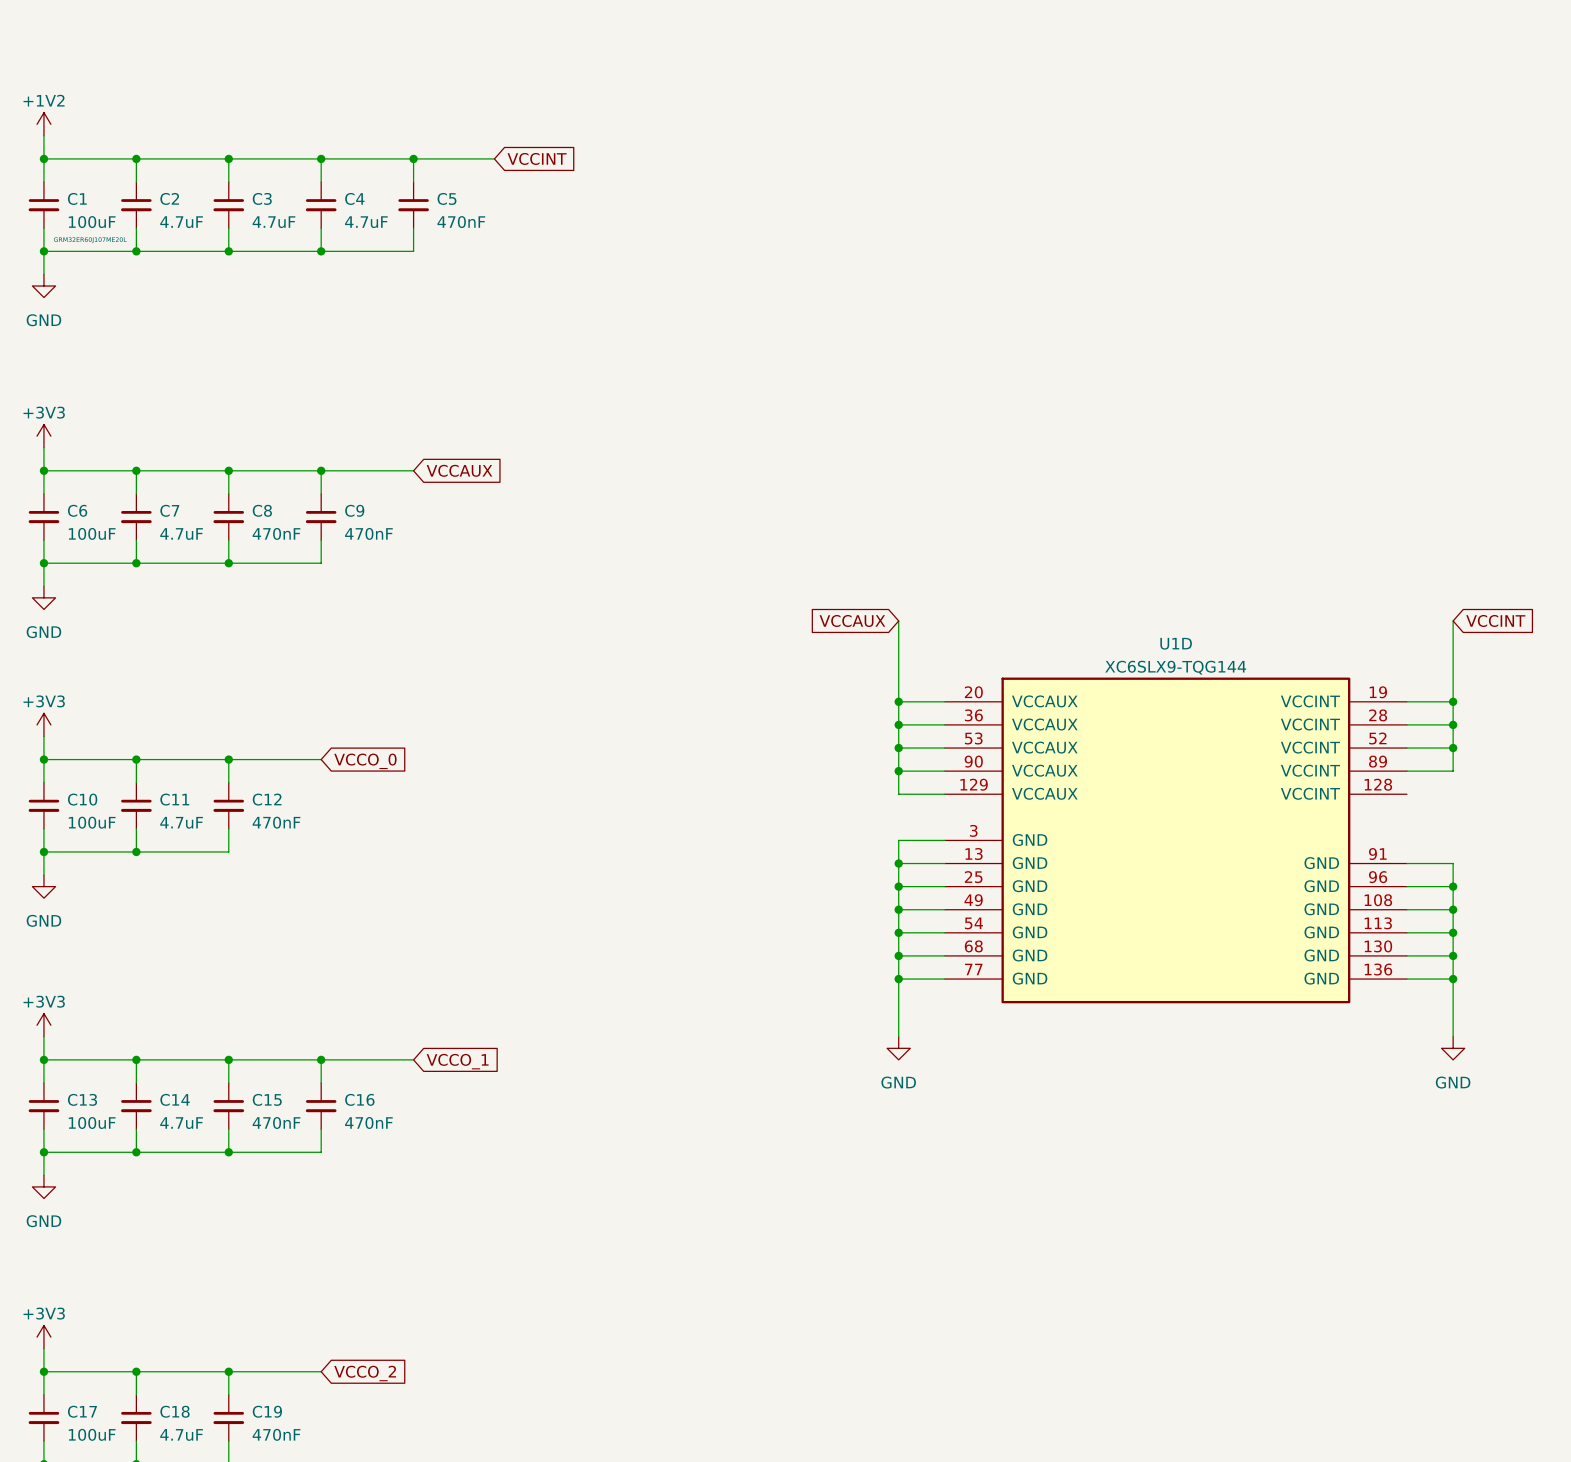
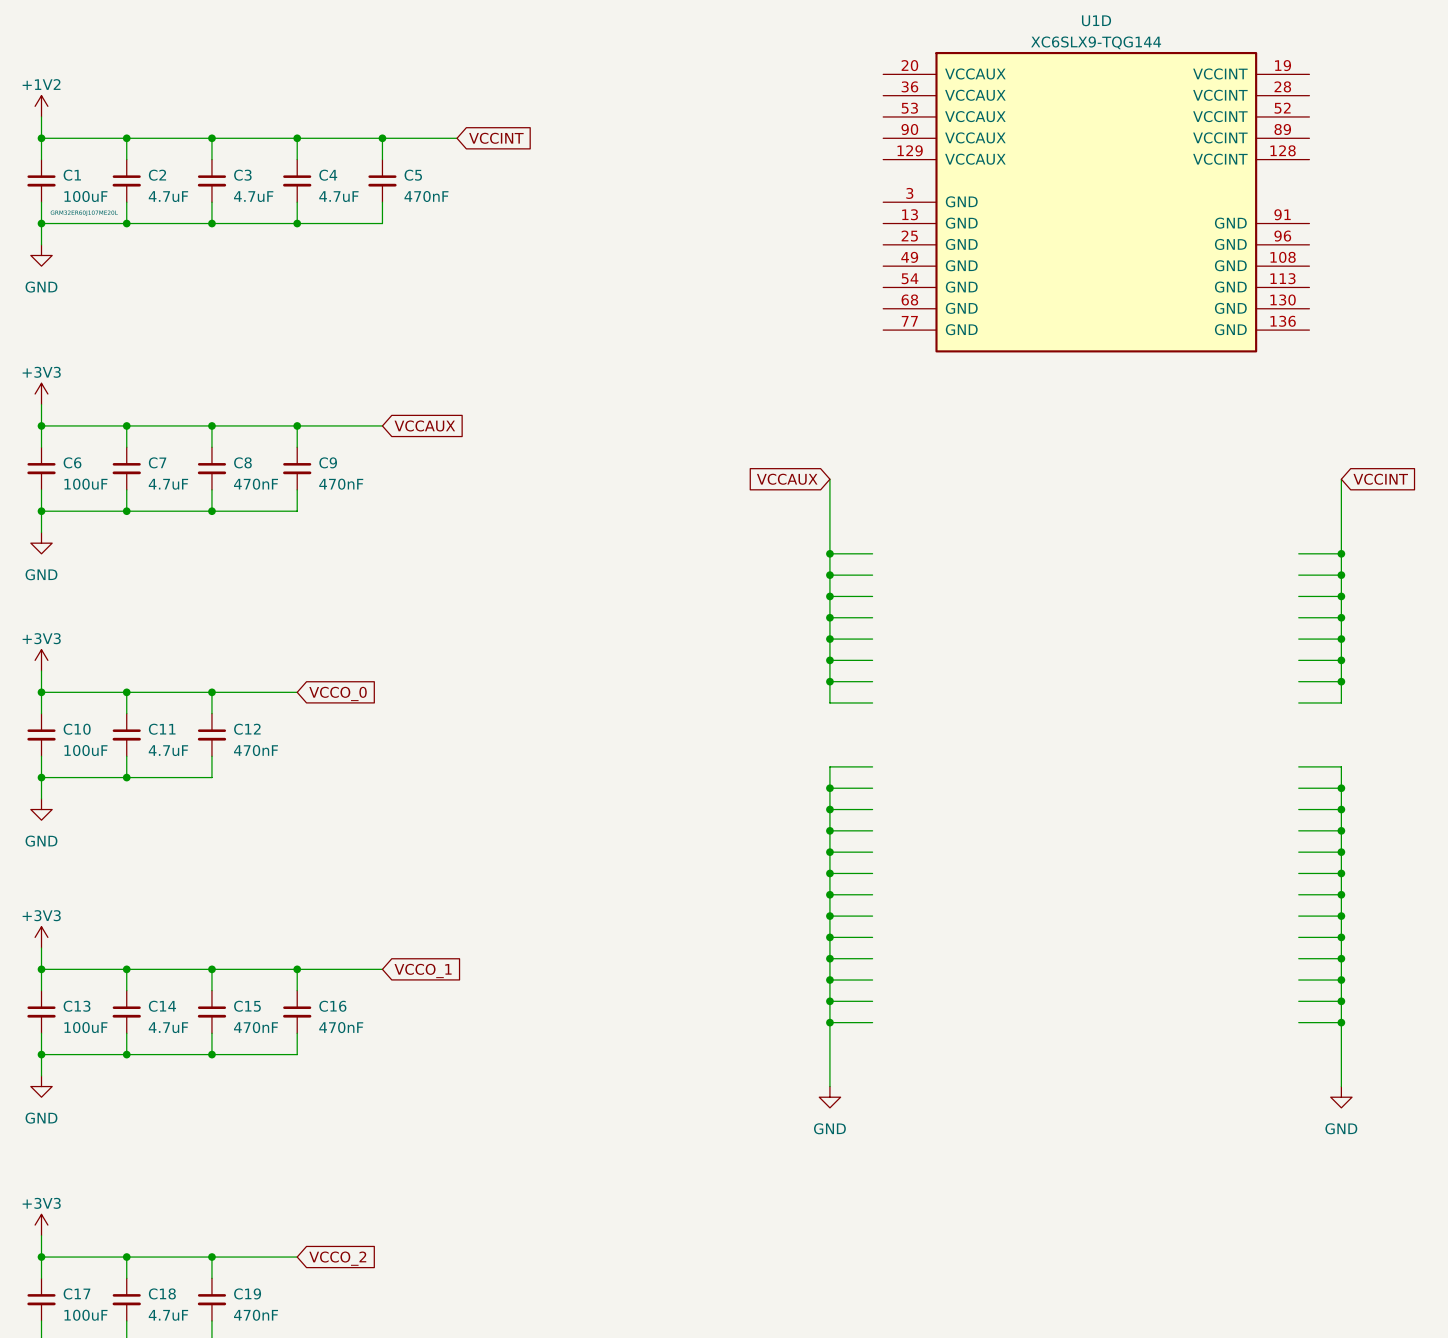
wire: none -> (829, 479) (829, 564)
wire: none -> (1341, 479) (1341, 564)
wire: none -> (829, 553) (872, 553)
junction: none -> (829, 553)
wire: none -> (1298, 553) (1341, 553)
junction: none -> (1341, 553)
global label position: VCCAUX (852, 620) -> VCCAUX (787, 479)
global label position: VCCINT (1495, 620) -> VCCINT (1380, 479)
wire: none -> (829, 575) (872, 575)
junction: none -> (829, 575)
wire: none -> (1298, 575) (1341, 575)
junction: none -> (1341, 575)
wire: none -> (829, 596) (872, 596)
junction: none -> (829, 596)
wire: none -> (1298, 596) (1341, 596)
junction: none -> (1341, 596)
wire: none -> (829, 617) (872, 617)
junction: none -> (829, 617)
wire: none -> (1298, 617) (1341, 617)
junction: none -> (1341, 617)
wire: (898, 771) (898, 794) (944, 794) -> none
junction: (898, 771) -> none
U1D position: (1175, 840) -> (1096, 202)
wire: none -> (1298, 766) (1341, 766) (1341, 788)
junction: none -> (1341, 788)
wire: none -> (829, 916) (872, 916)
junction: none -> (829, 916)
wire: none -> (1298, 916) (1341, 916)
junction: none -> (1341, 916)
wire: none -> (829, 937) (872, 937)
junction: none -> (829, 937)
wire: none -> (1298, 937) (1341, 937)
junction: none -> (1341, 937)
wire: none -> (829, 948) (829, 1086)
wire: none -> (1341, 948) (1341, 1086)
wire: none -> (829, 958) (872, 958)
junction: none -> (829, 958)
power symbol position: GND (898, 1048) -> GND (829, 1097)
wire: none -> (1298, 958) (1341, 958)
junction: none -> (1341, 958)
power symbol position: GND (1453, 1048) -> GND (1341, 1097)
wire: none -> (829, 980) (872, 980)
junction: none -> (829, 980)
wire: none -> (1298, 980) (1341, 980)
junction: none -> (1341, 980)
wire: none -> (829, 1001) (872, 1001)
junction: none -> (829, 1001)
wire: none -> (1298, 1001) (1341, 1001)
junction: none -> (1341, 1001)
wire: none -> (829, 1022) (872, 1022)
junction: none -> (829, 1022)
wire: none -> (1298, 1022) (1341, 1022)
junction: none -> (1341, 1022)

